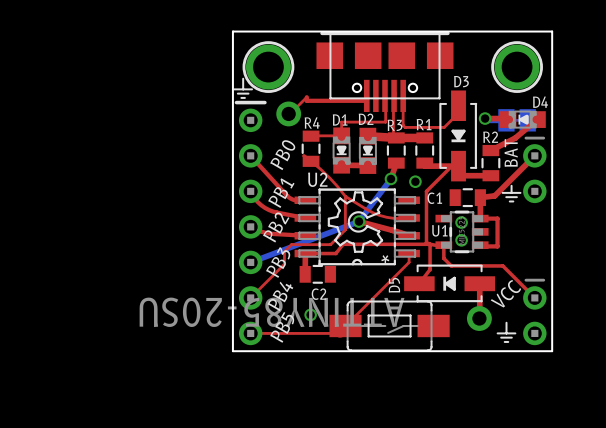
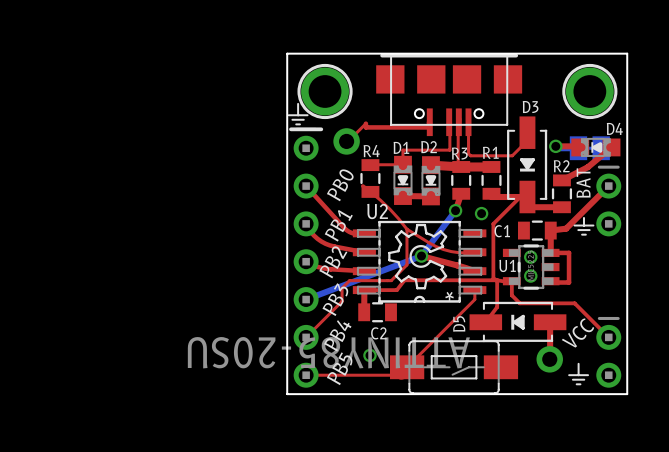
part footprint: [316, 31, 454, 113] -> [376, 53, 523, 137]

